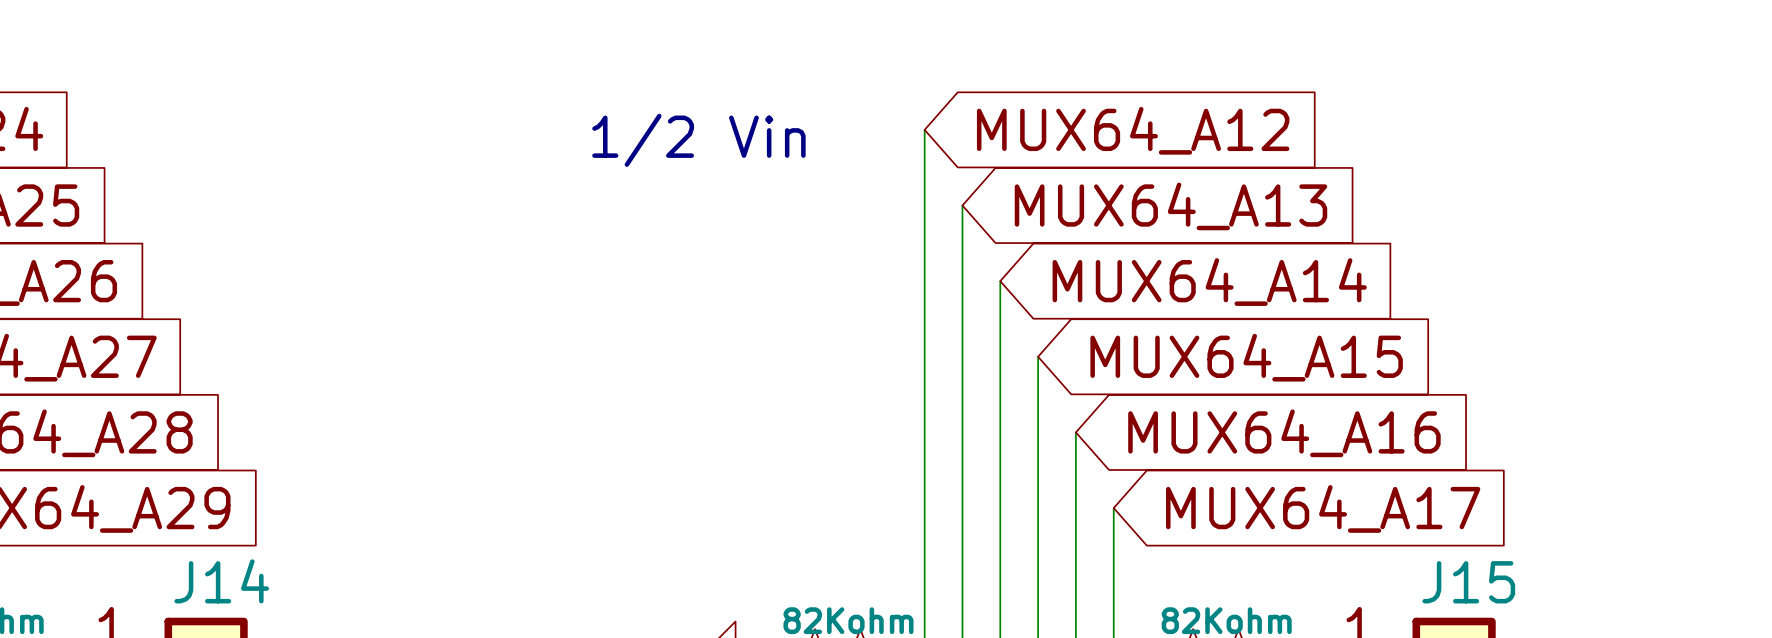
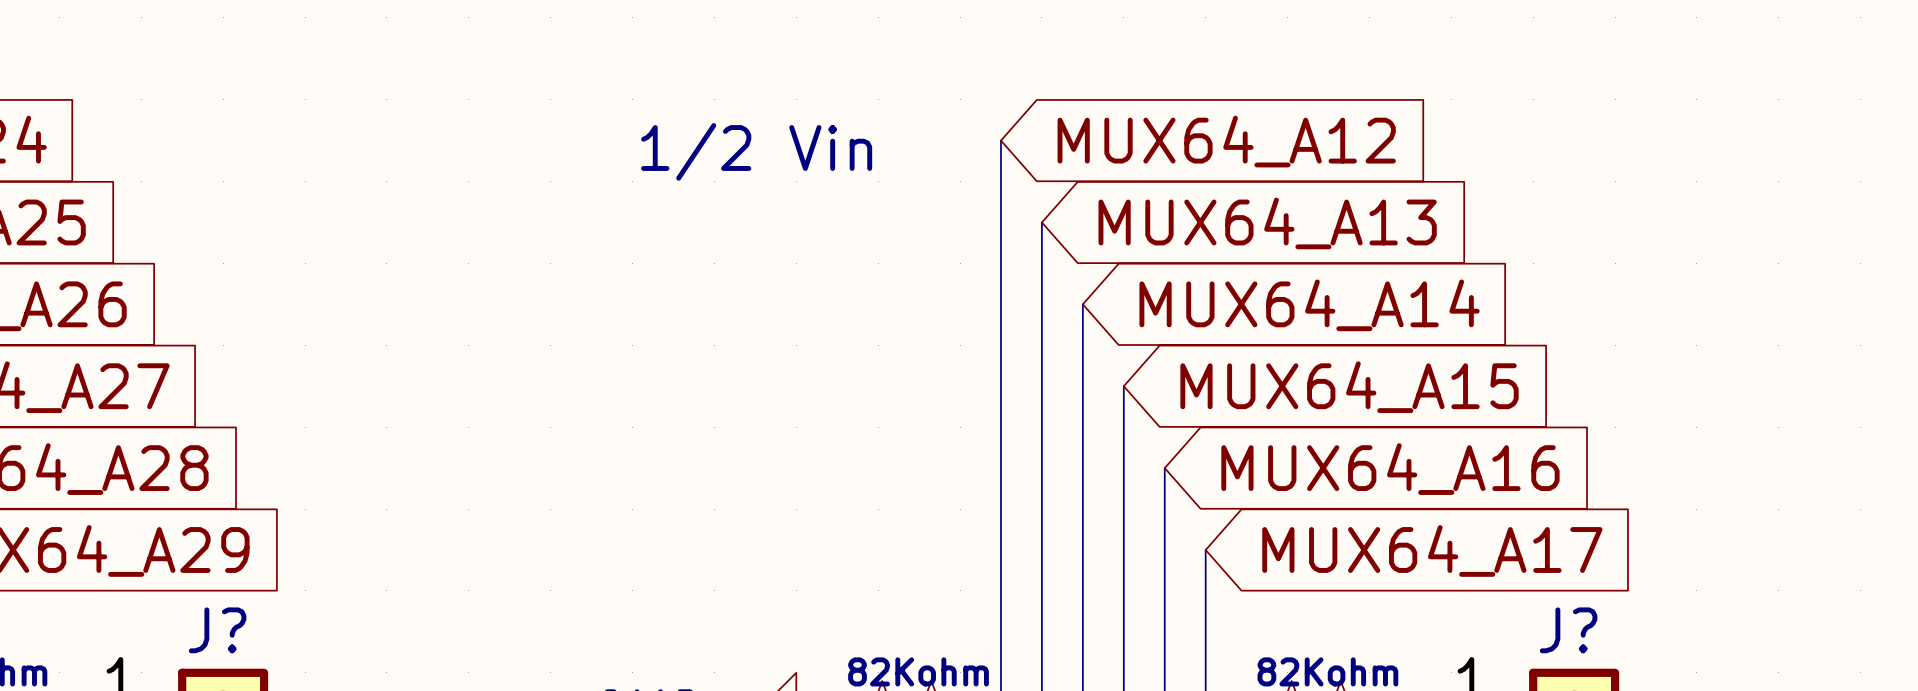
J14 name: J14 (221, 581) -> J? (217, 630)
J15 name: J15 (1468, 582) -> J? (1568, 630)

